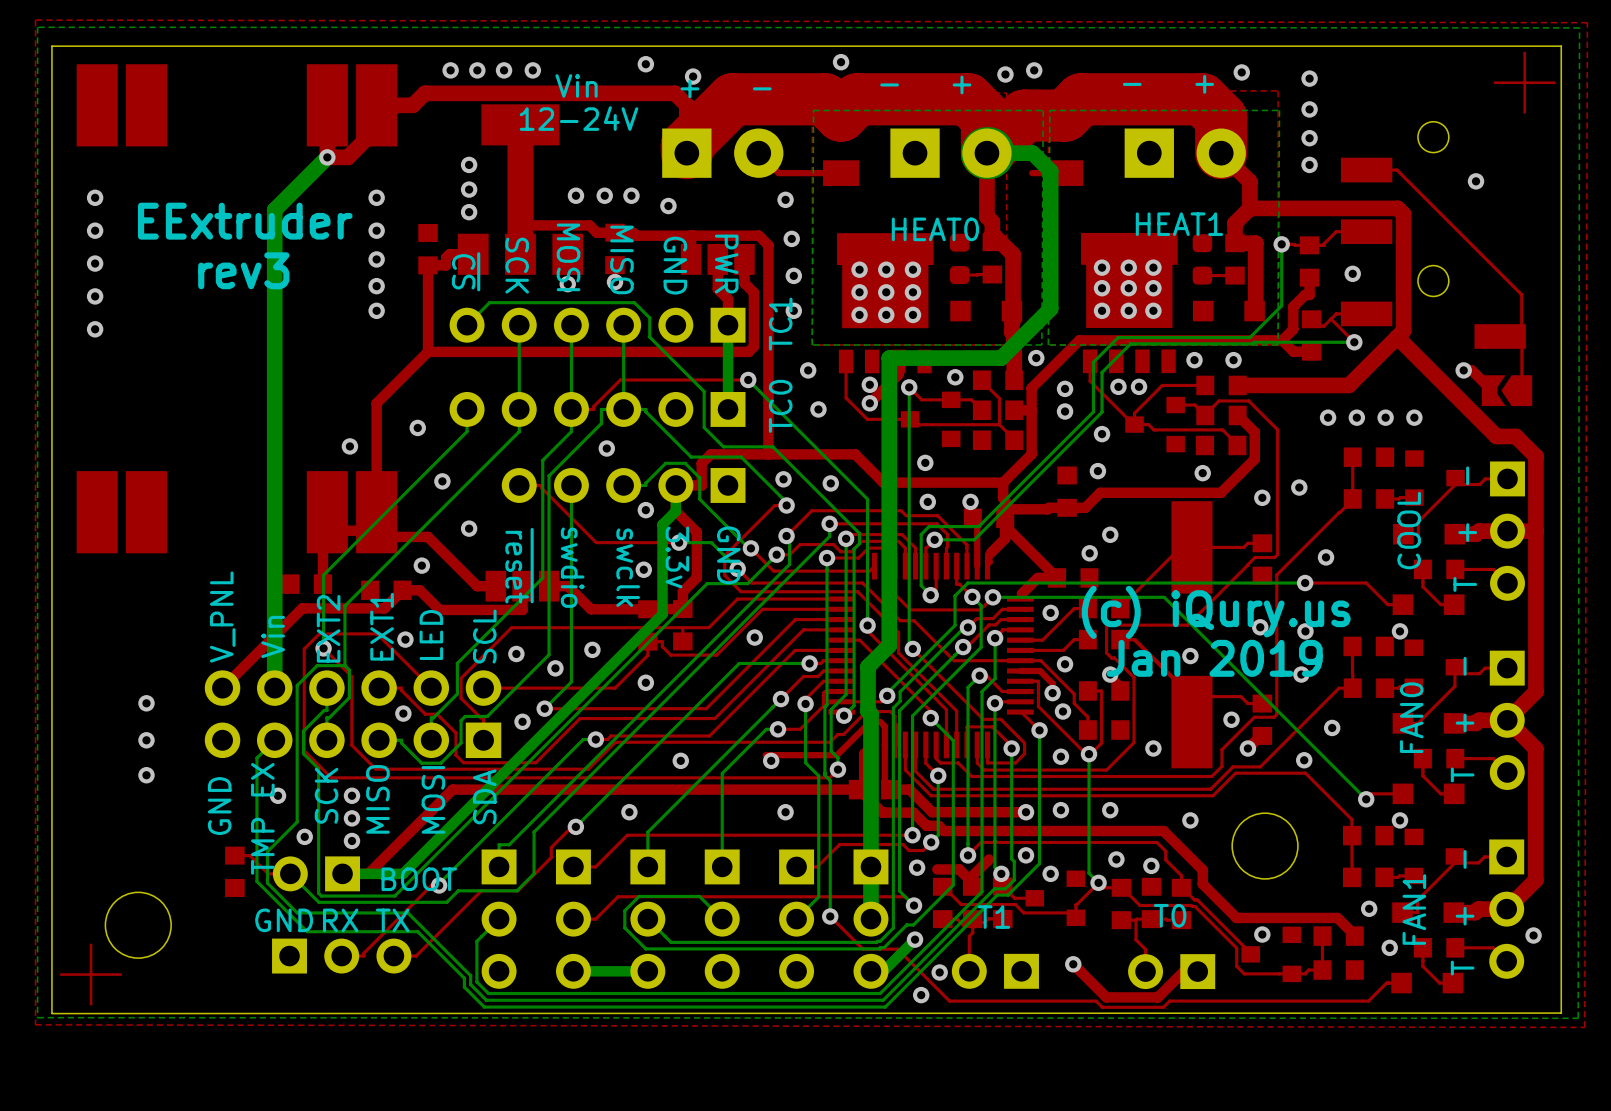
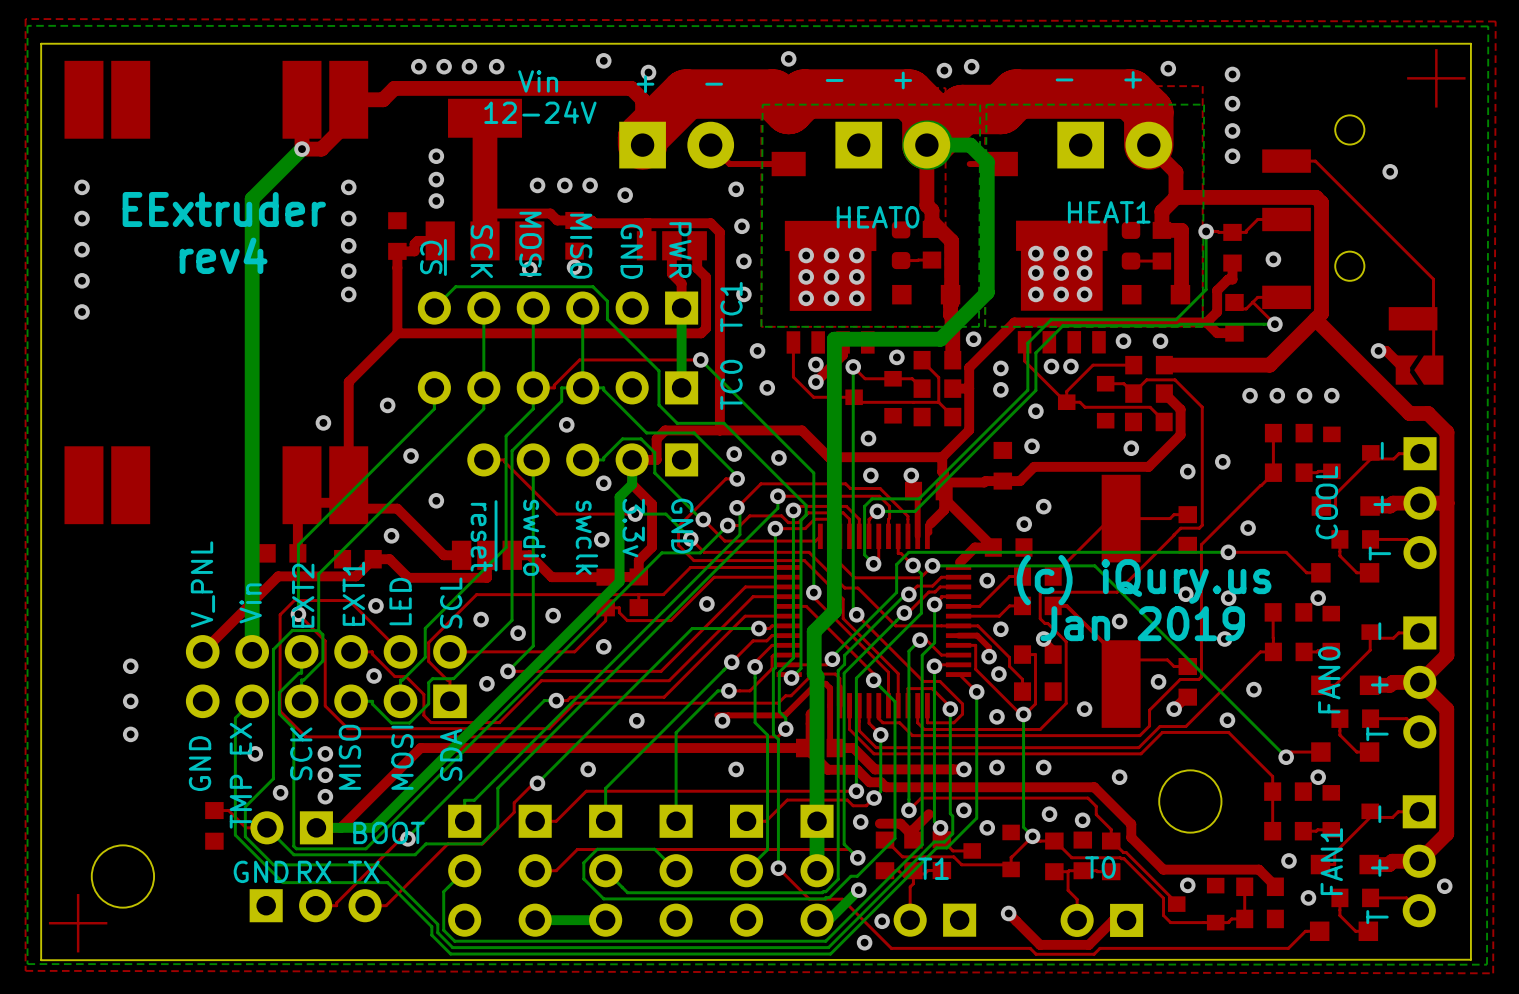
text: rev3 (243, 270) -> rev4 (223, 255)

